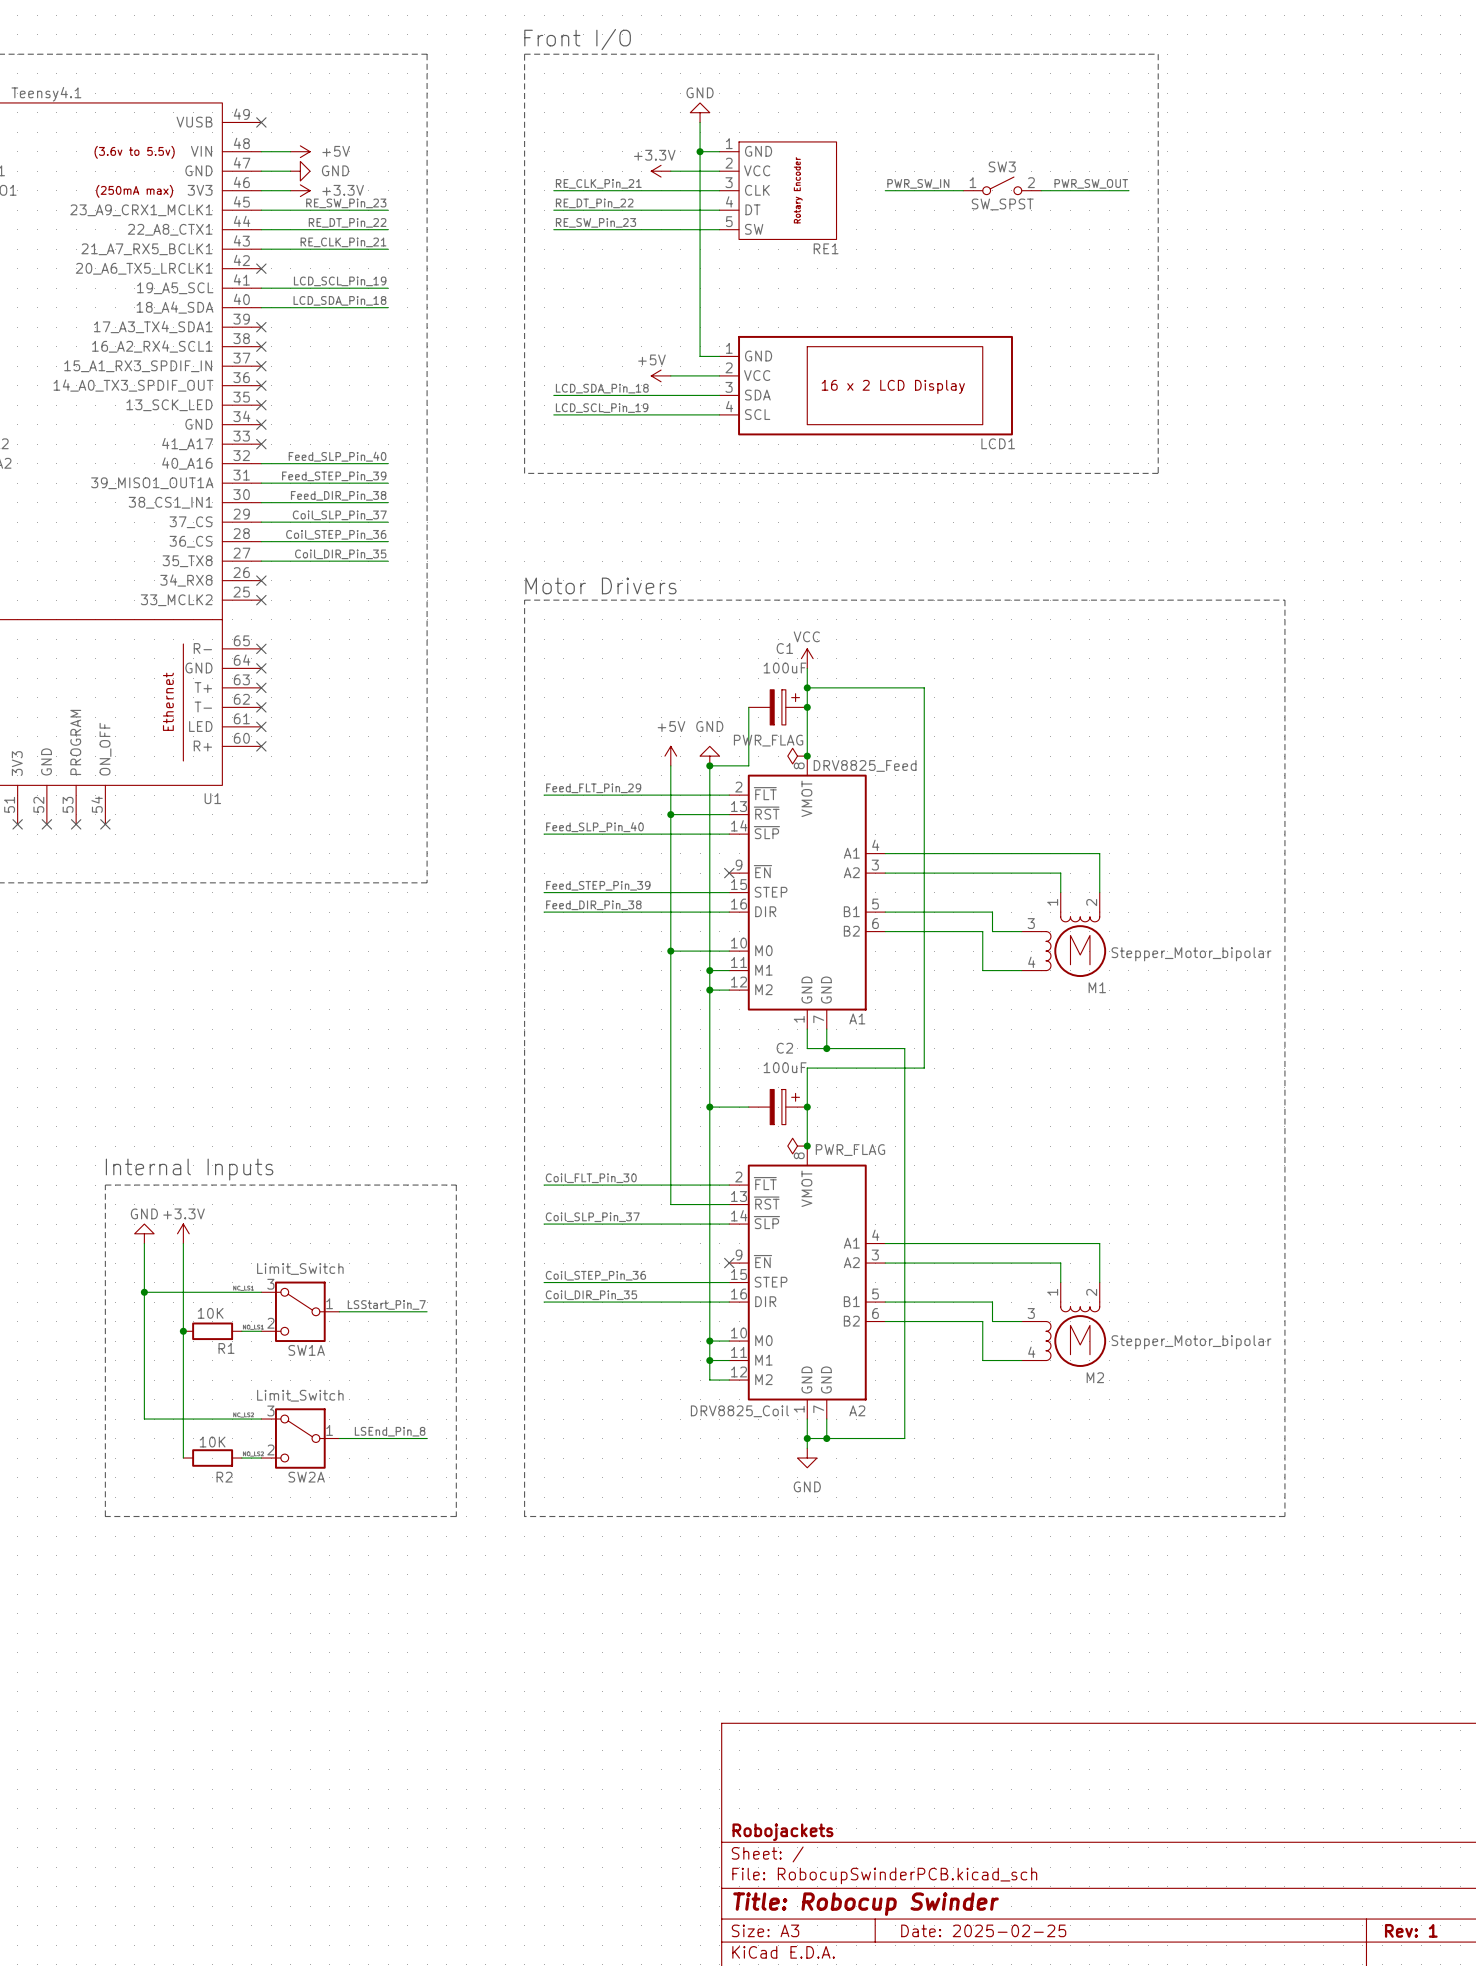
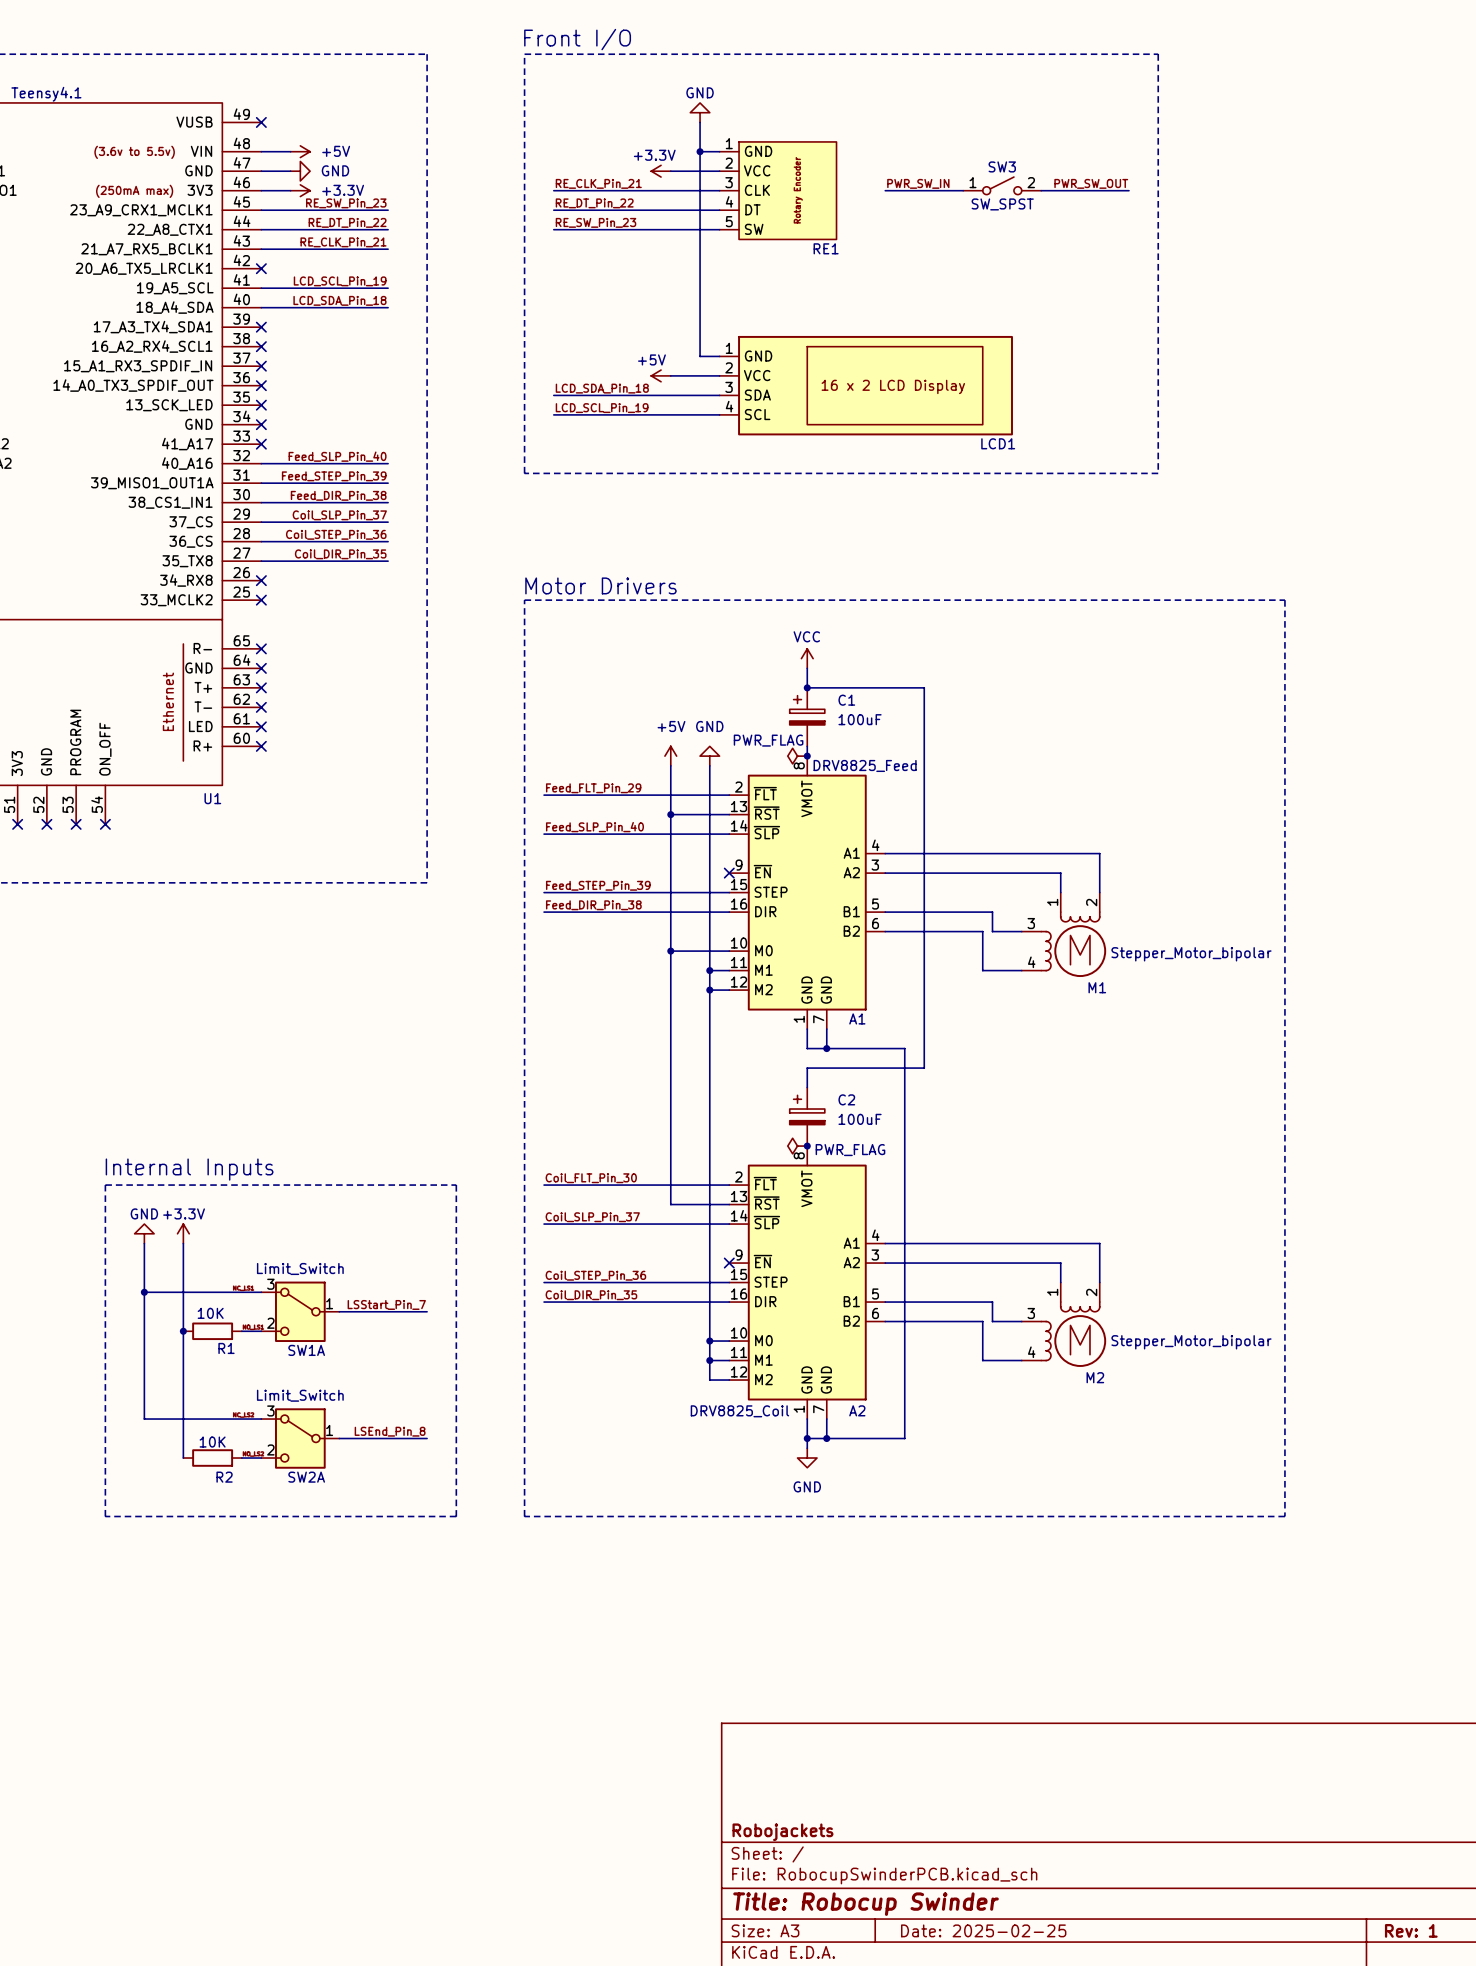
C1 name position: C1 (784, 648) -> C1 (846, 700)
C1 value position: 100uF (785, 668) -> 100uF (860, 719)
wire: (748, 707) (748, 765) (709, 765) -> none
C1 rotation: 0° (784, 707) -> 90° counterclockwise (807, 710)
junction: (807, 707) -> none
junction: (709, 765) -> none
C2 name position: C2 (784, 1048) -> C2 (846, 1099)
C2 value position: 100uF (785, 1067) -> 100uF (860, 1119)
wire: (709, 1107) (748, 1107) -> none
junction: (709, 1107) -> none
C2 rotation: 0° (784, 1107) -> 90° counterclockwise (807, 1109)
junction: (807, 1107) -> none

